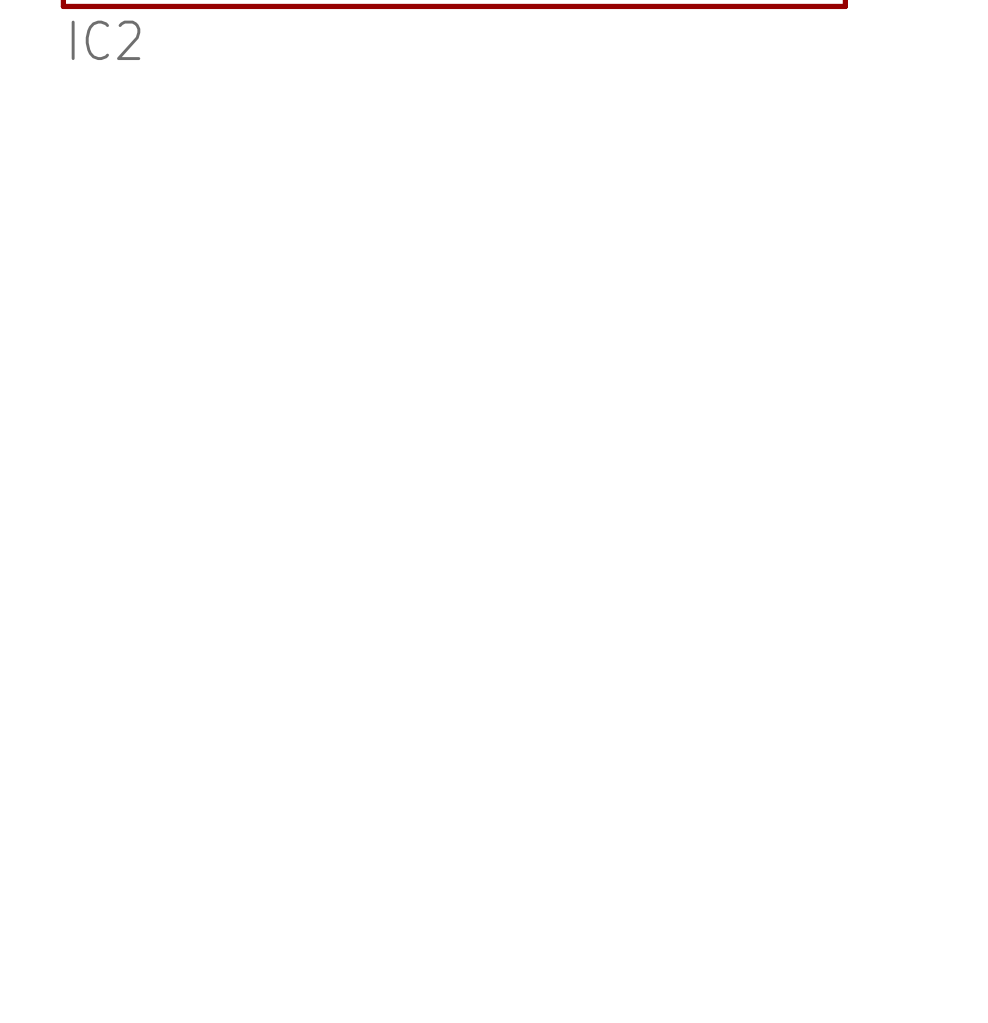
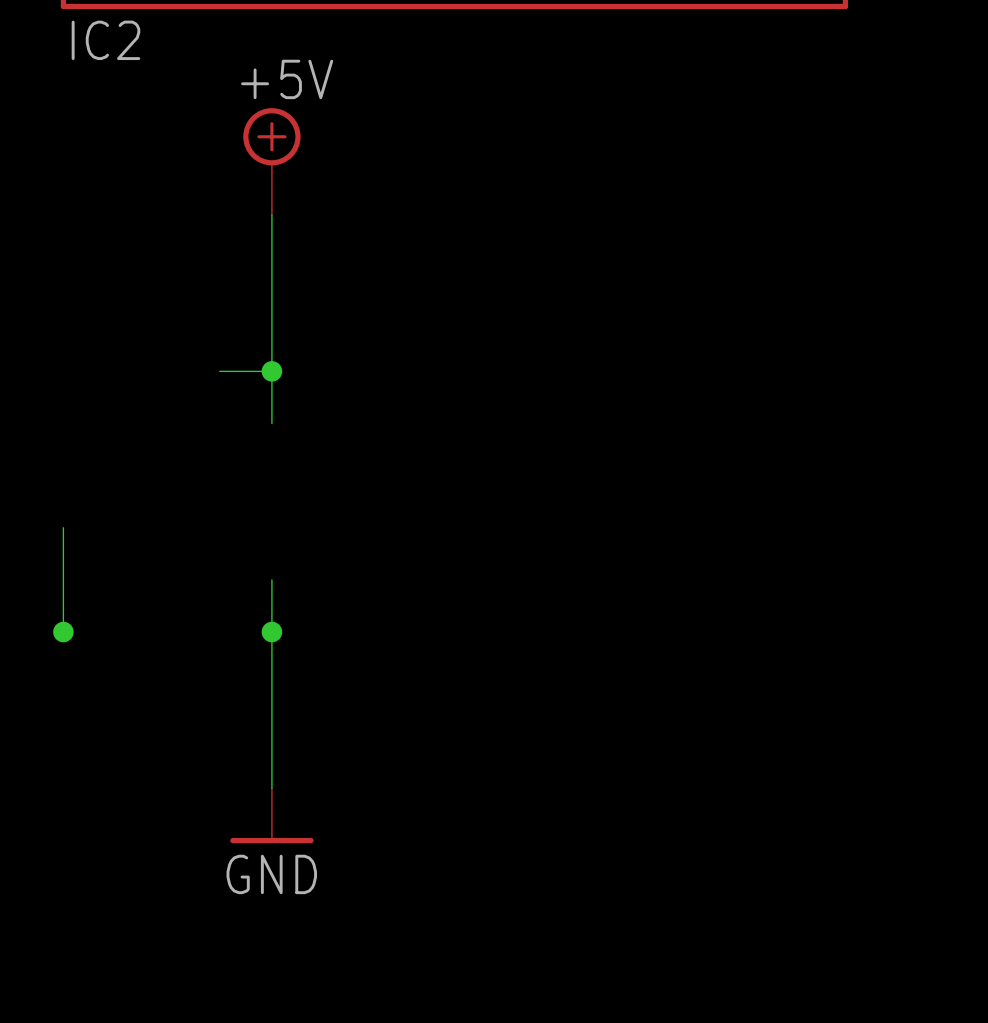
power symbol: none -> +5V (271, 161)
wire: none -> (271, 214) (271, 423)
wire: none -> (219, 371) (271, 371)
junction: none -> (271, 371)
wire: none -> (63, 527) (63, 632)
wire: none -> (271, 579) (271, 788)
junction: none -> (63, 632)
junction: none -> (271, 632)
power symbol: none -> GND (271, 815)

